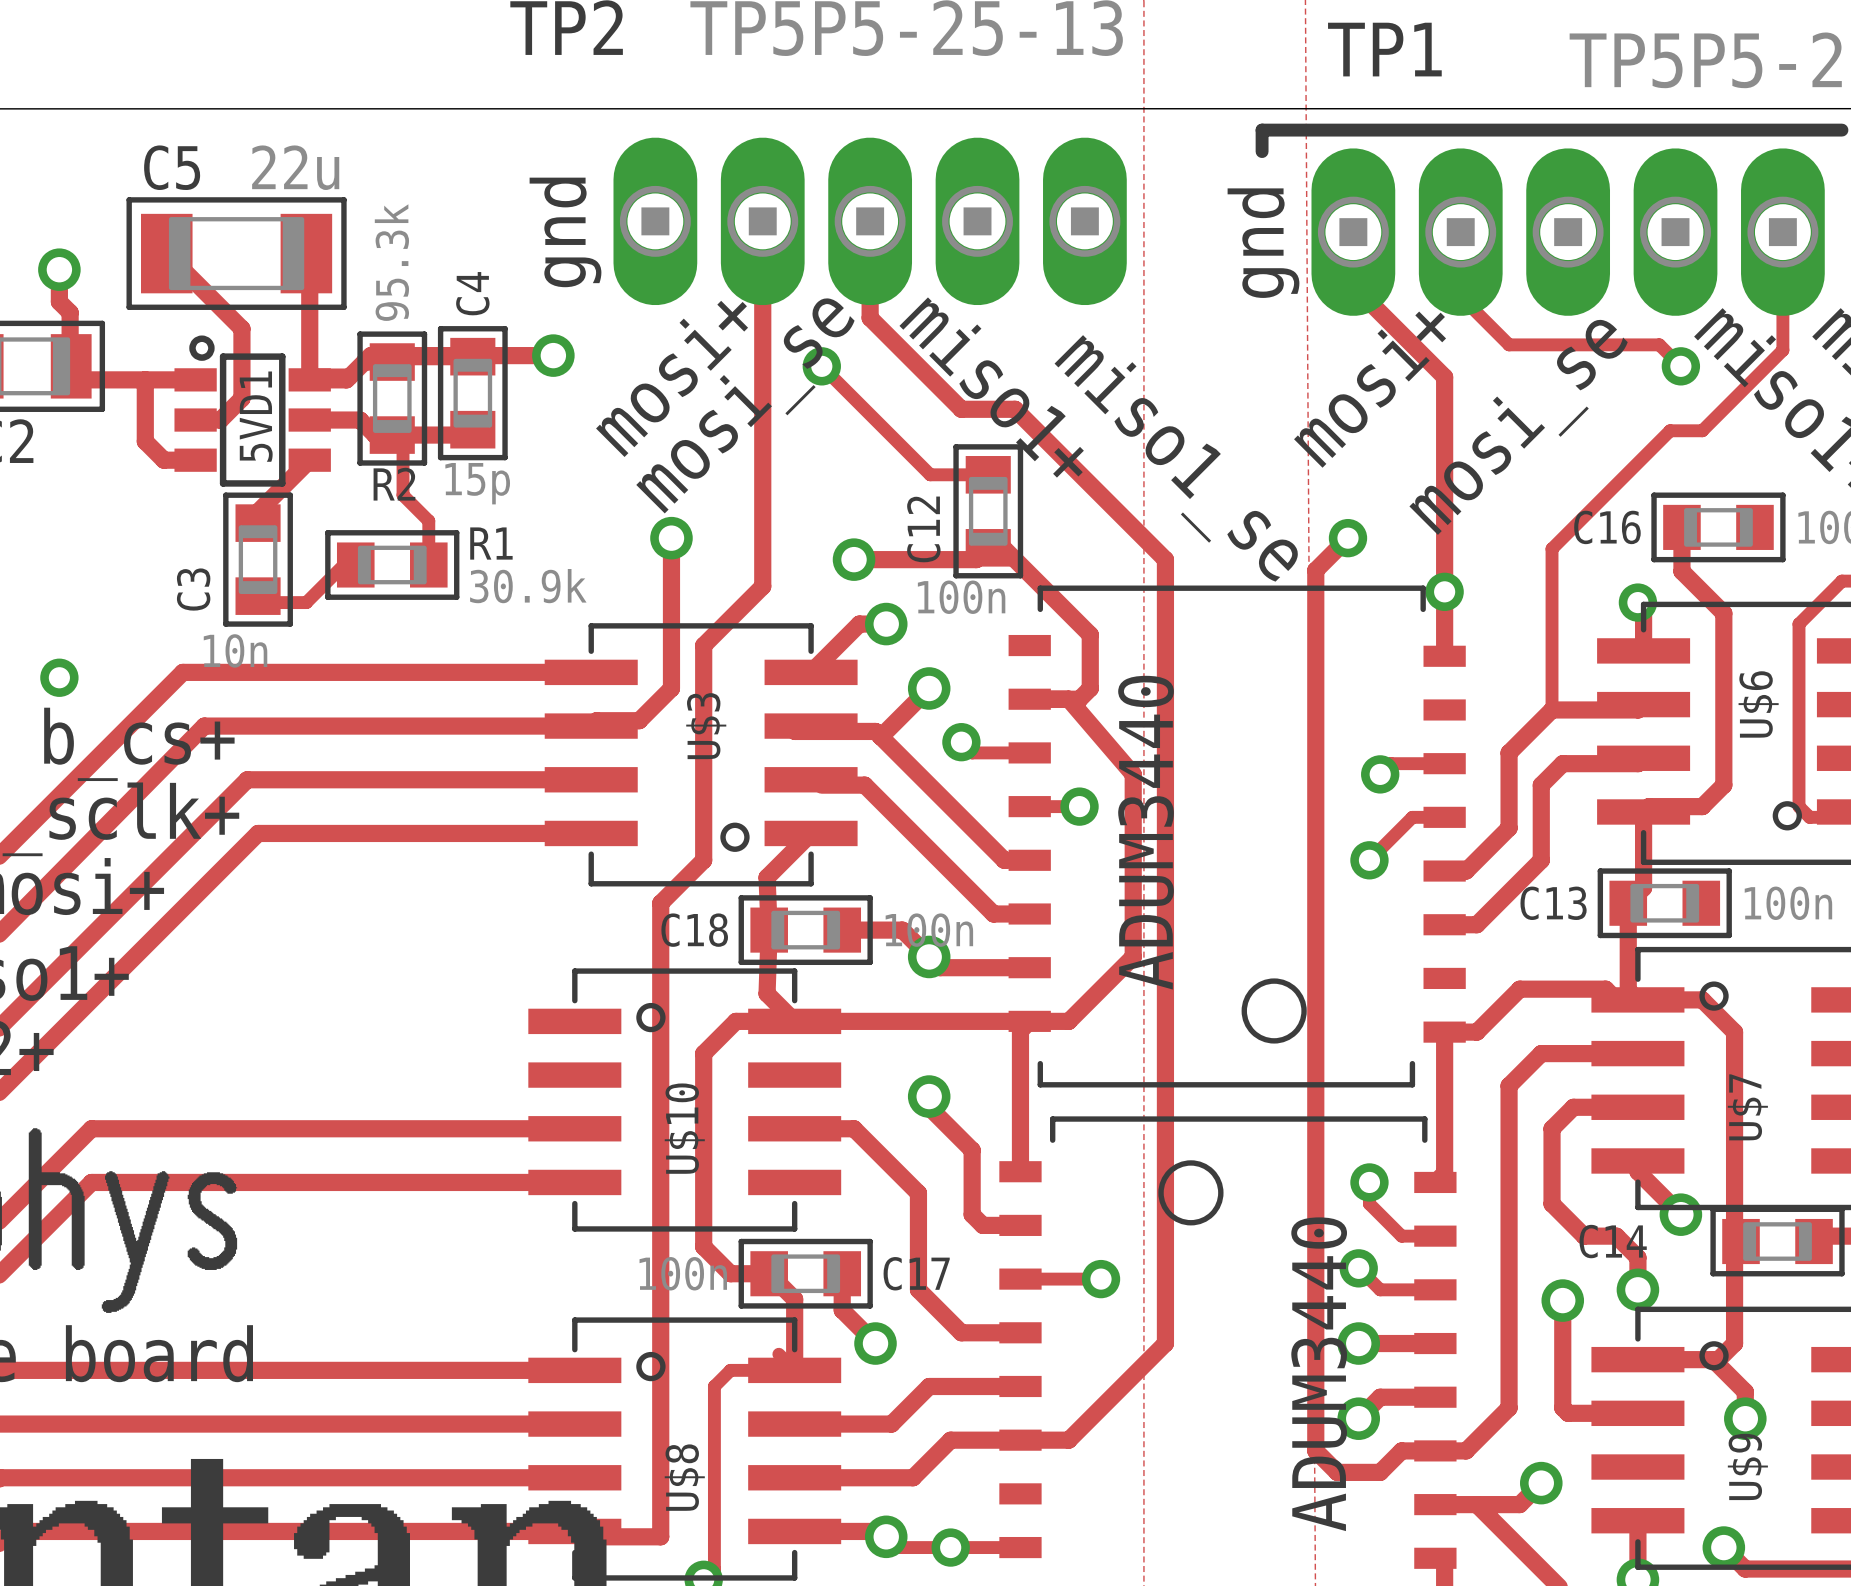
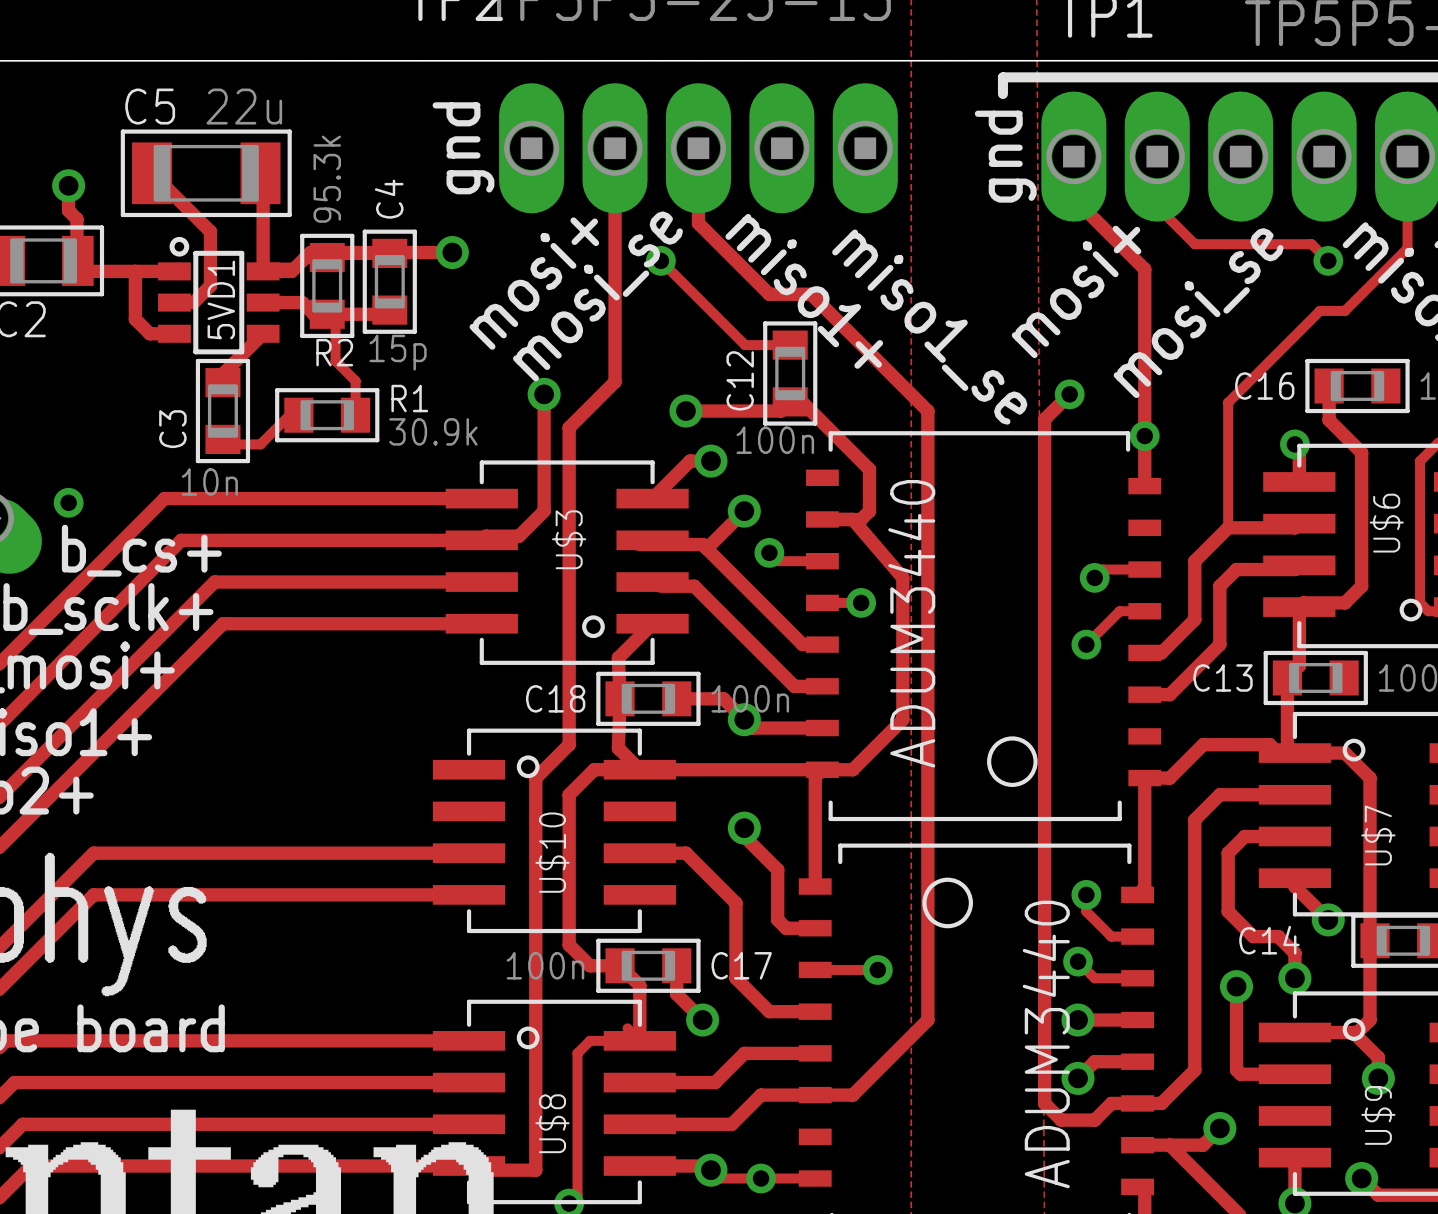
track: (762, 522) (762, 586) (703, 645) -> (615, 381) (569, 427) (569, 477)
track: (703, 860) (660, 903) (660, 1032) -> (569, 644) (569, 744) (535, 778)

